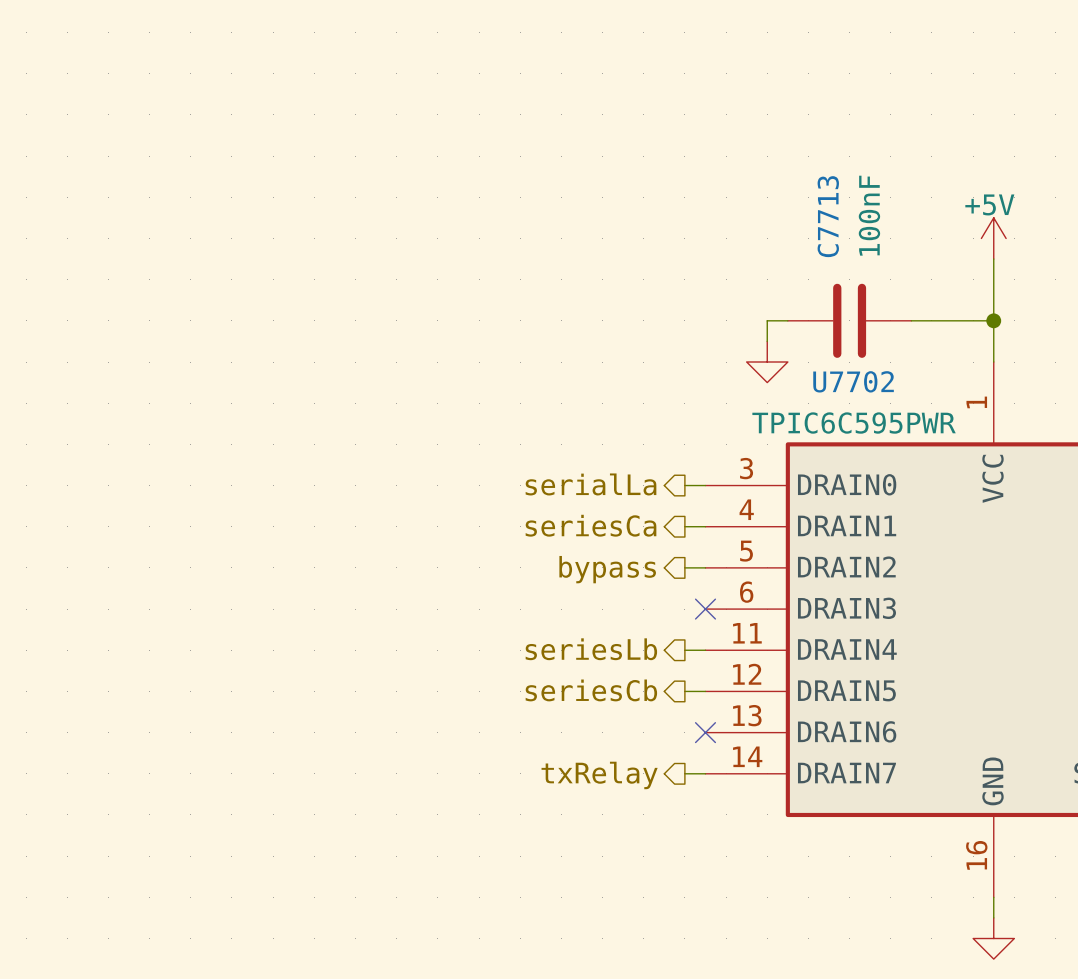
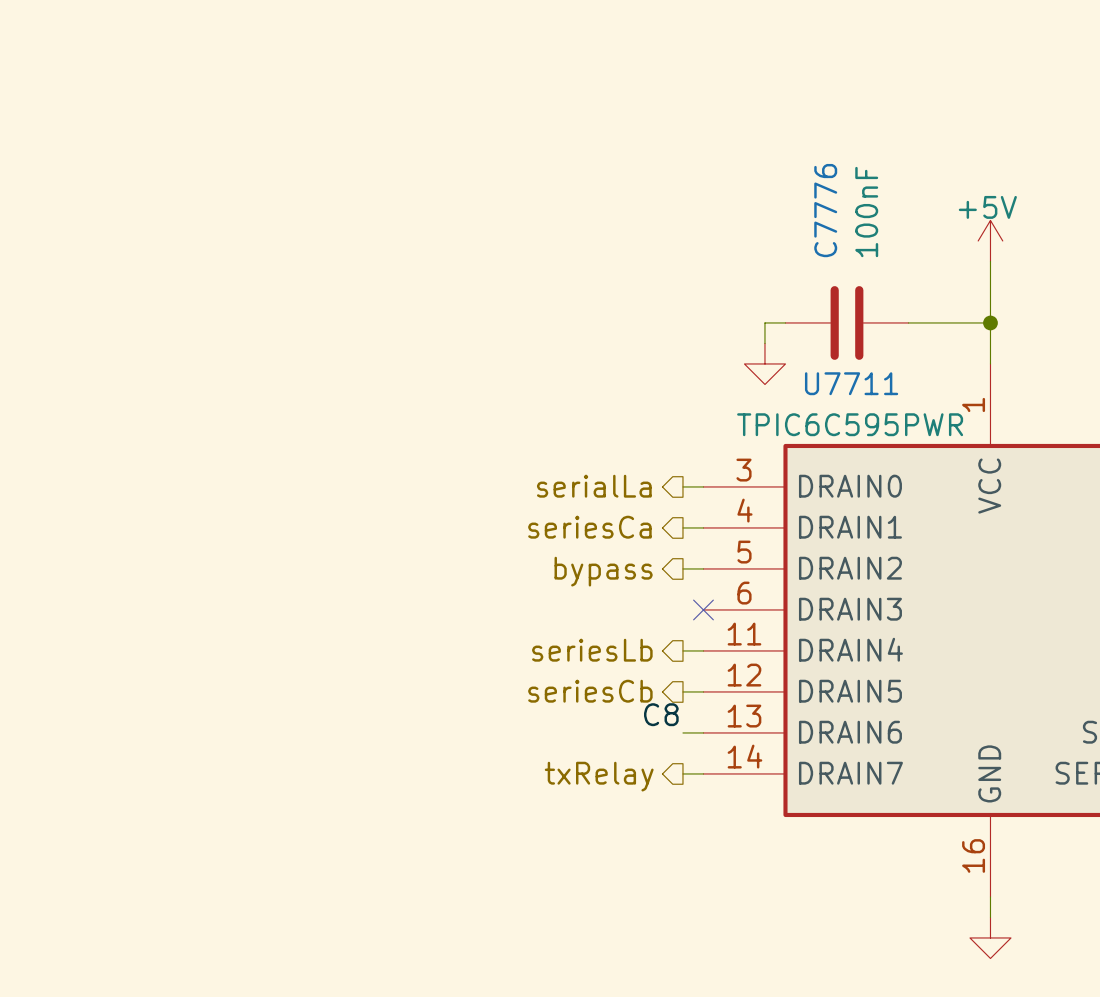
C7713 name: C7713 (828, 216) -> C7776 (825, 210)
U7702 name: U7702 (853, 381) -> U7711 (851, 383)
label: none -> C8 (661, 714)
wire: none -> (682, 732) (703, 732)
no-connect mark: (705, 732) -> none

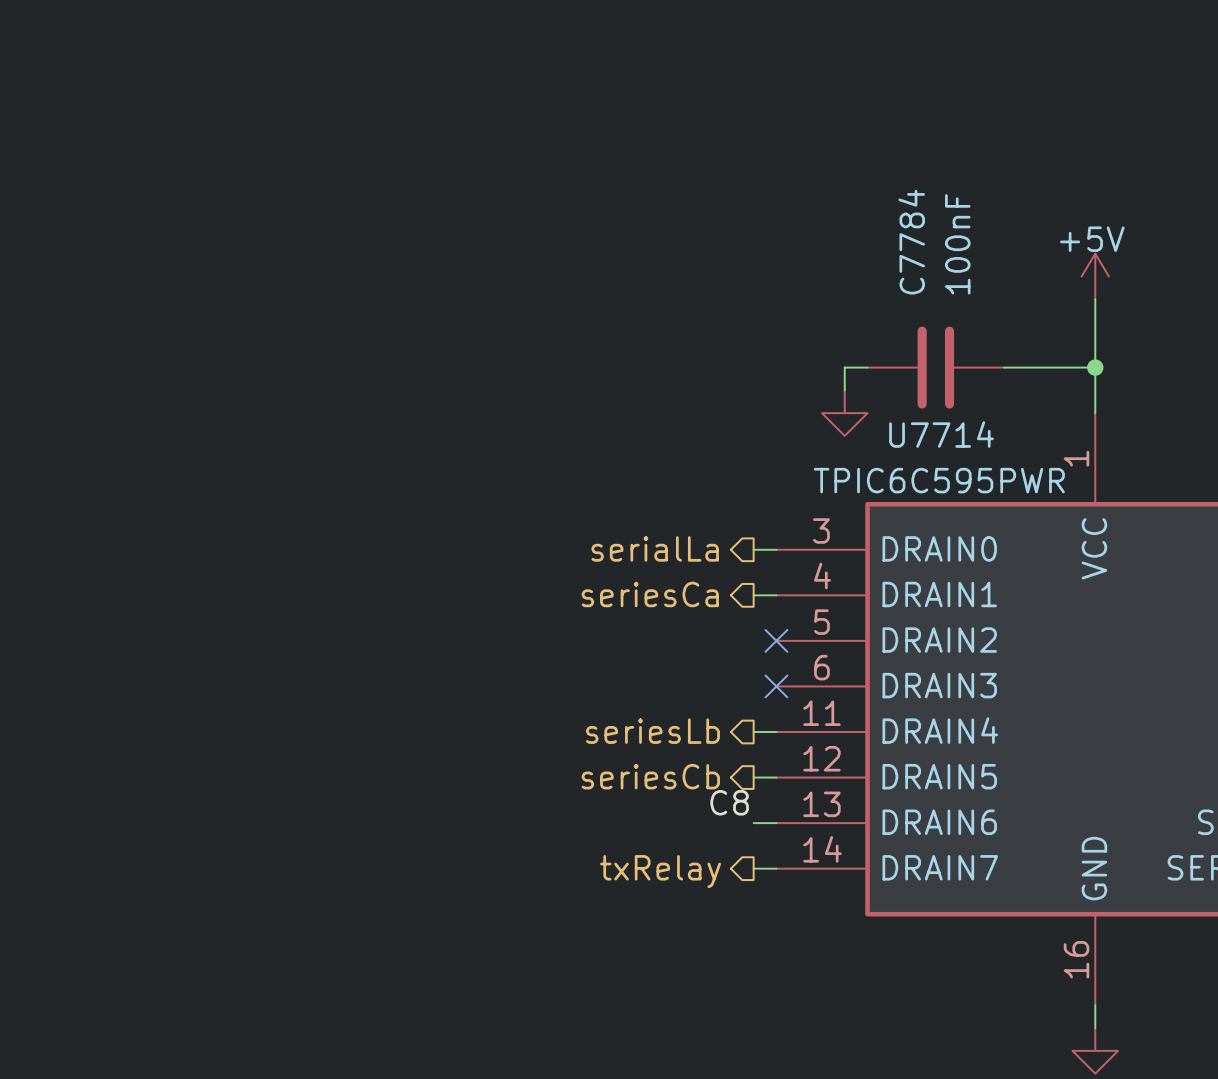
C7776 name: C7776 (825, 210) -> C7784 (911, 242)
U7711 name: U7711 (851, 383) -> U7714 (941, 434)
wire: (682, 568) (703, 568) -> none
no-connect mark: none -> (776, 640)
hierarchical label: bypass (603, 571) -> none

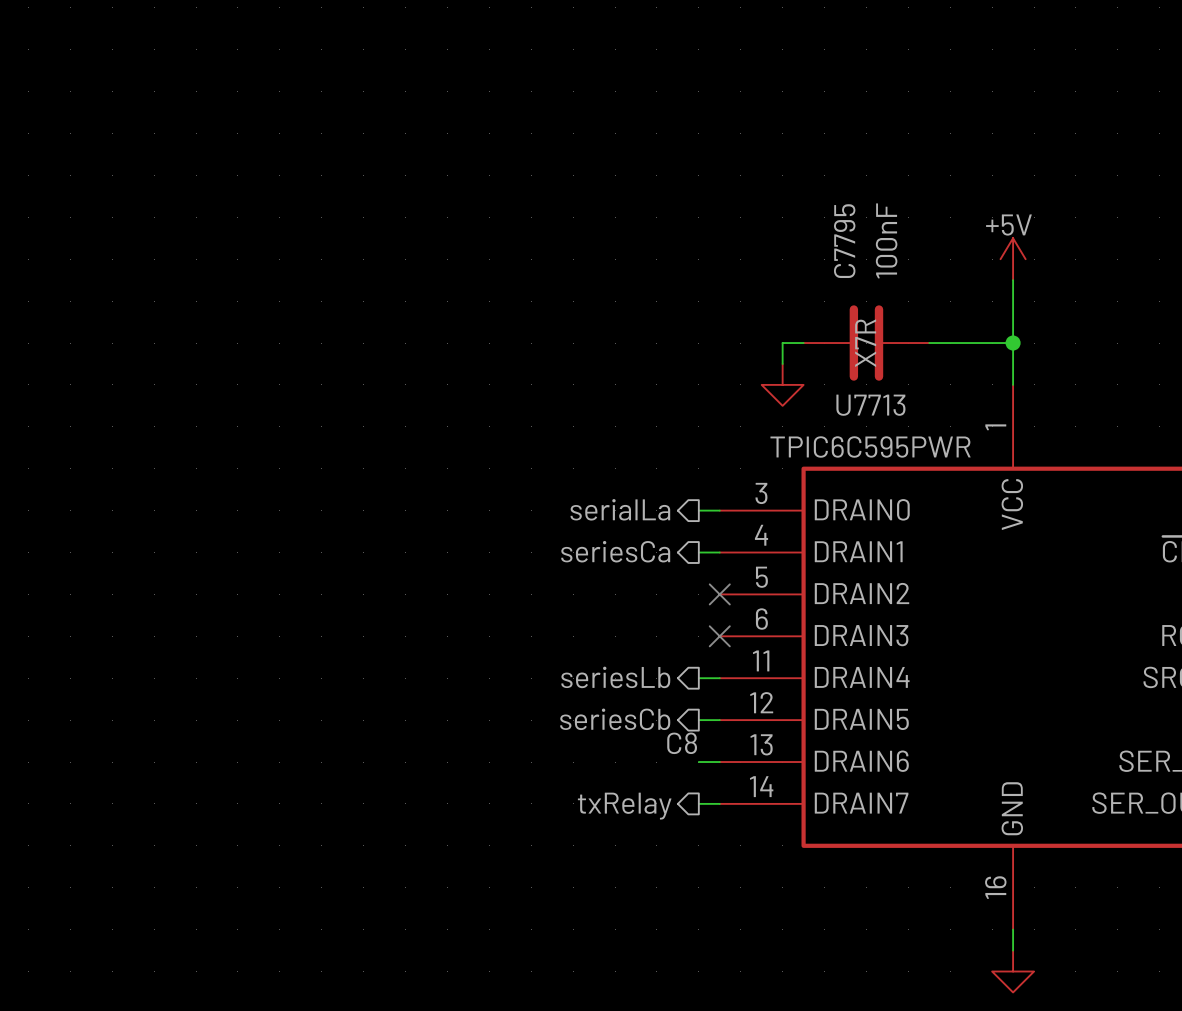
C7784 name: C7784 (911, 242) -> C7795 (844, 241)
C7784 text: none -> X7R (865, 343)
U7714 name: U7714 (941, 434) -> U7713 (870, 405)

